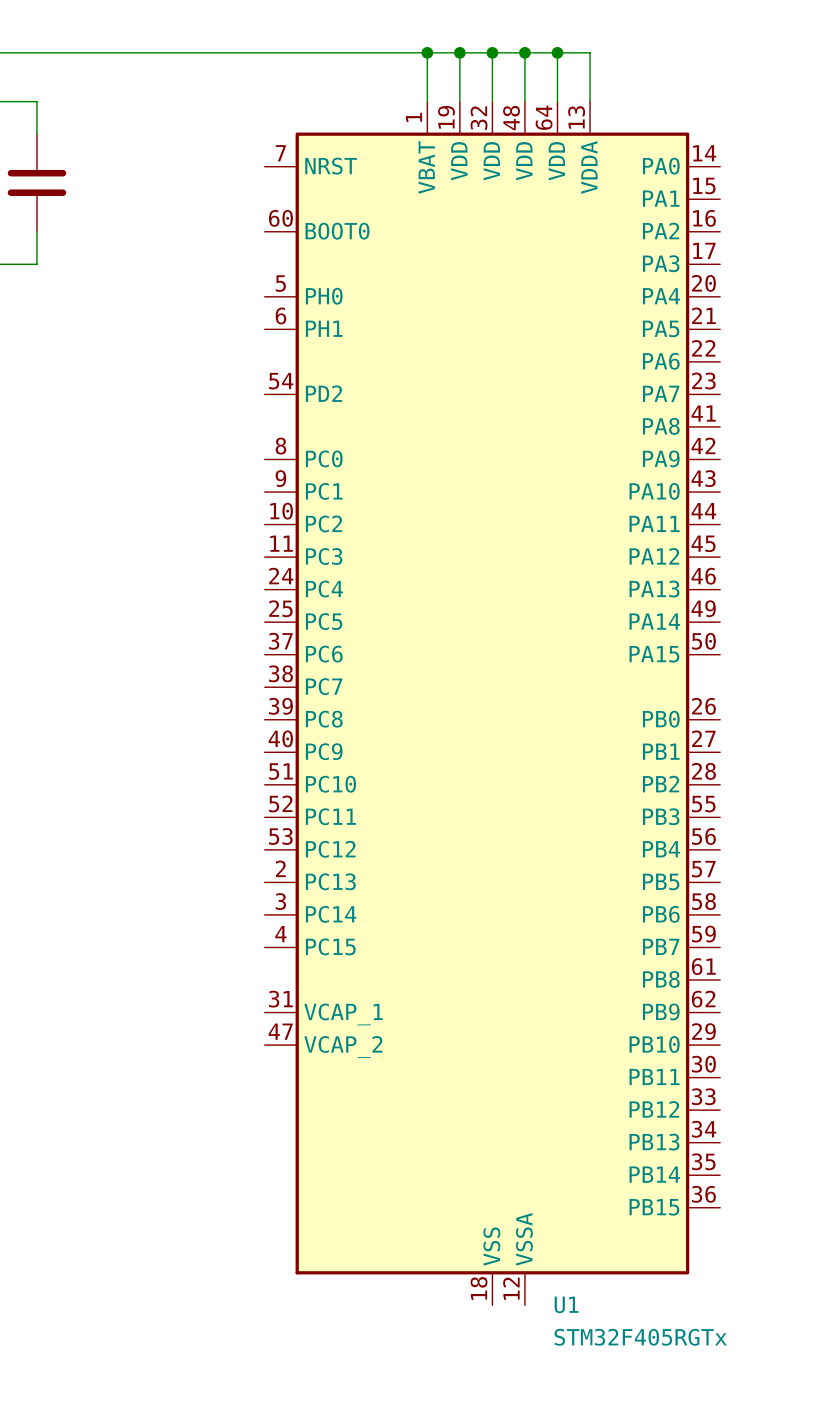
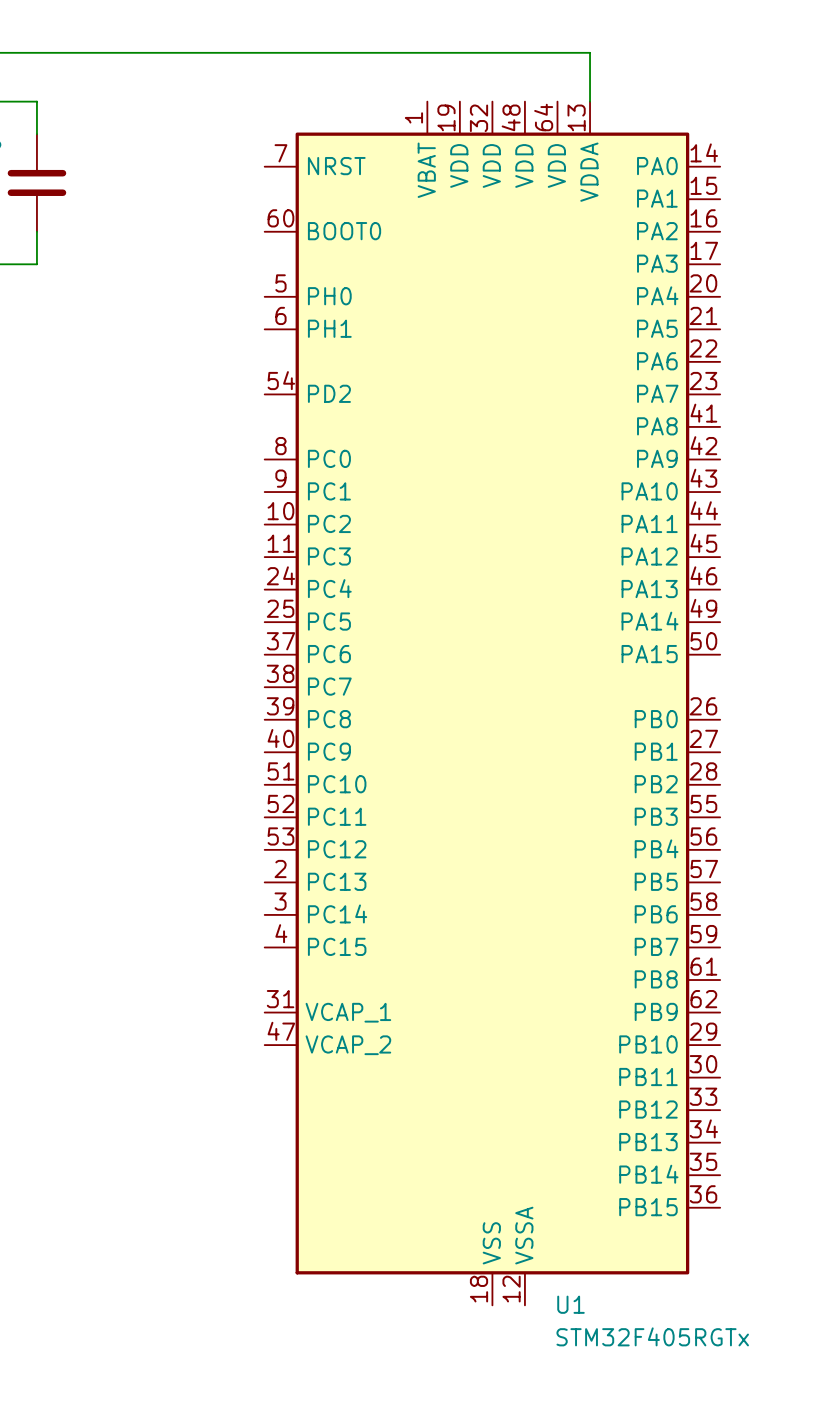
wire: (427, 52) (427, 101) -> none
junction: (427, 52) -> none
wire: (459, 52) (459, 101) -> none
junction: (459, 52) -> none
wire: (492, 52) (492, 101) -> none
junction: (492, 52) -> none
wire: (524, 52) (524, 101) -> none
junction: (524, 52) -> none
wire: (557, 52) (557, 101) -> none
junction: (557, 52) -> none

